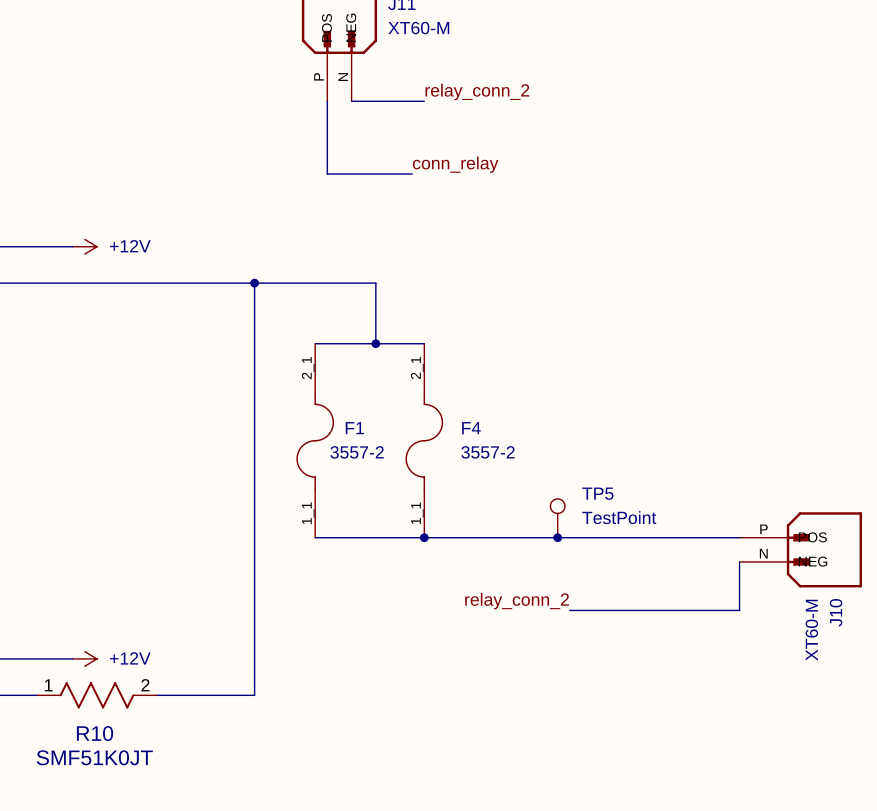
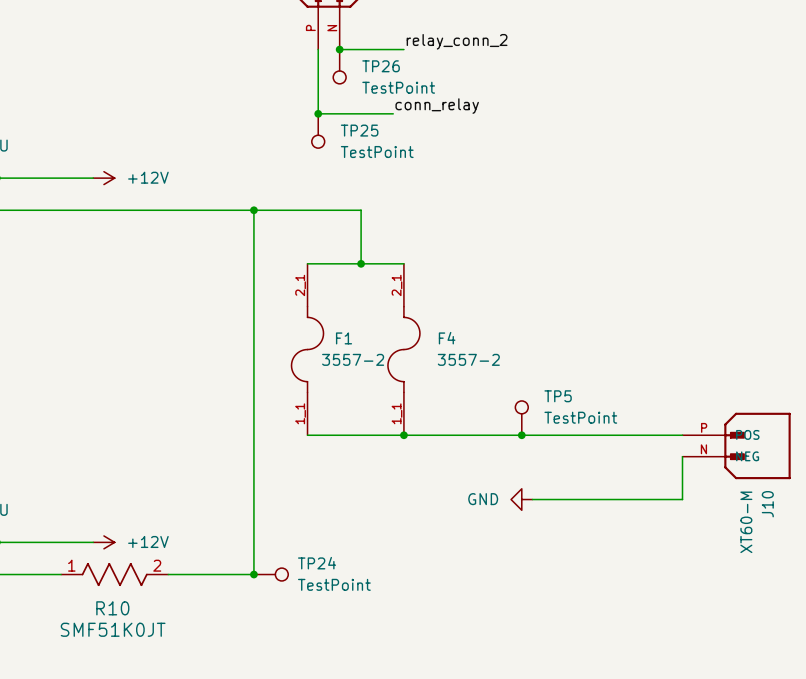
junction: none -> (339, 49)
TP26: none -> TestPoint (339, 66)
junction: none -> (318, 113)
TP25: none -> TestPoint (318, 130)
label: relay_conn_2 (517, 601) -> none
power symbol: none -> GND (521, 499)
junction: none -> (253, 574)
TP24: none -> TestPoint (271, 574)

